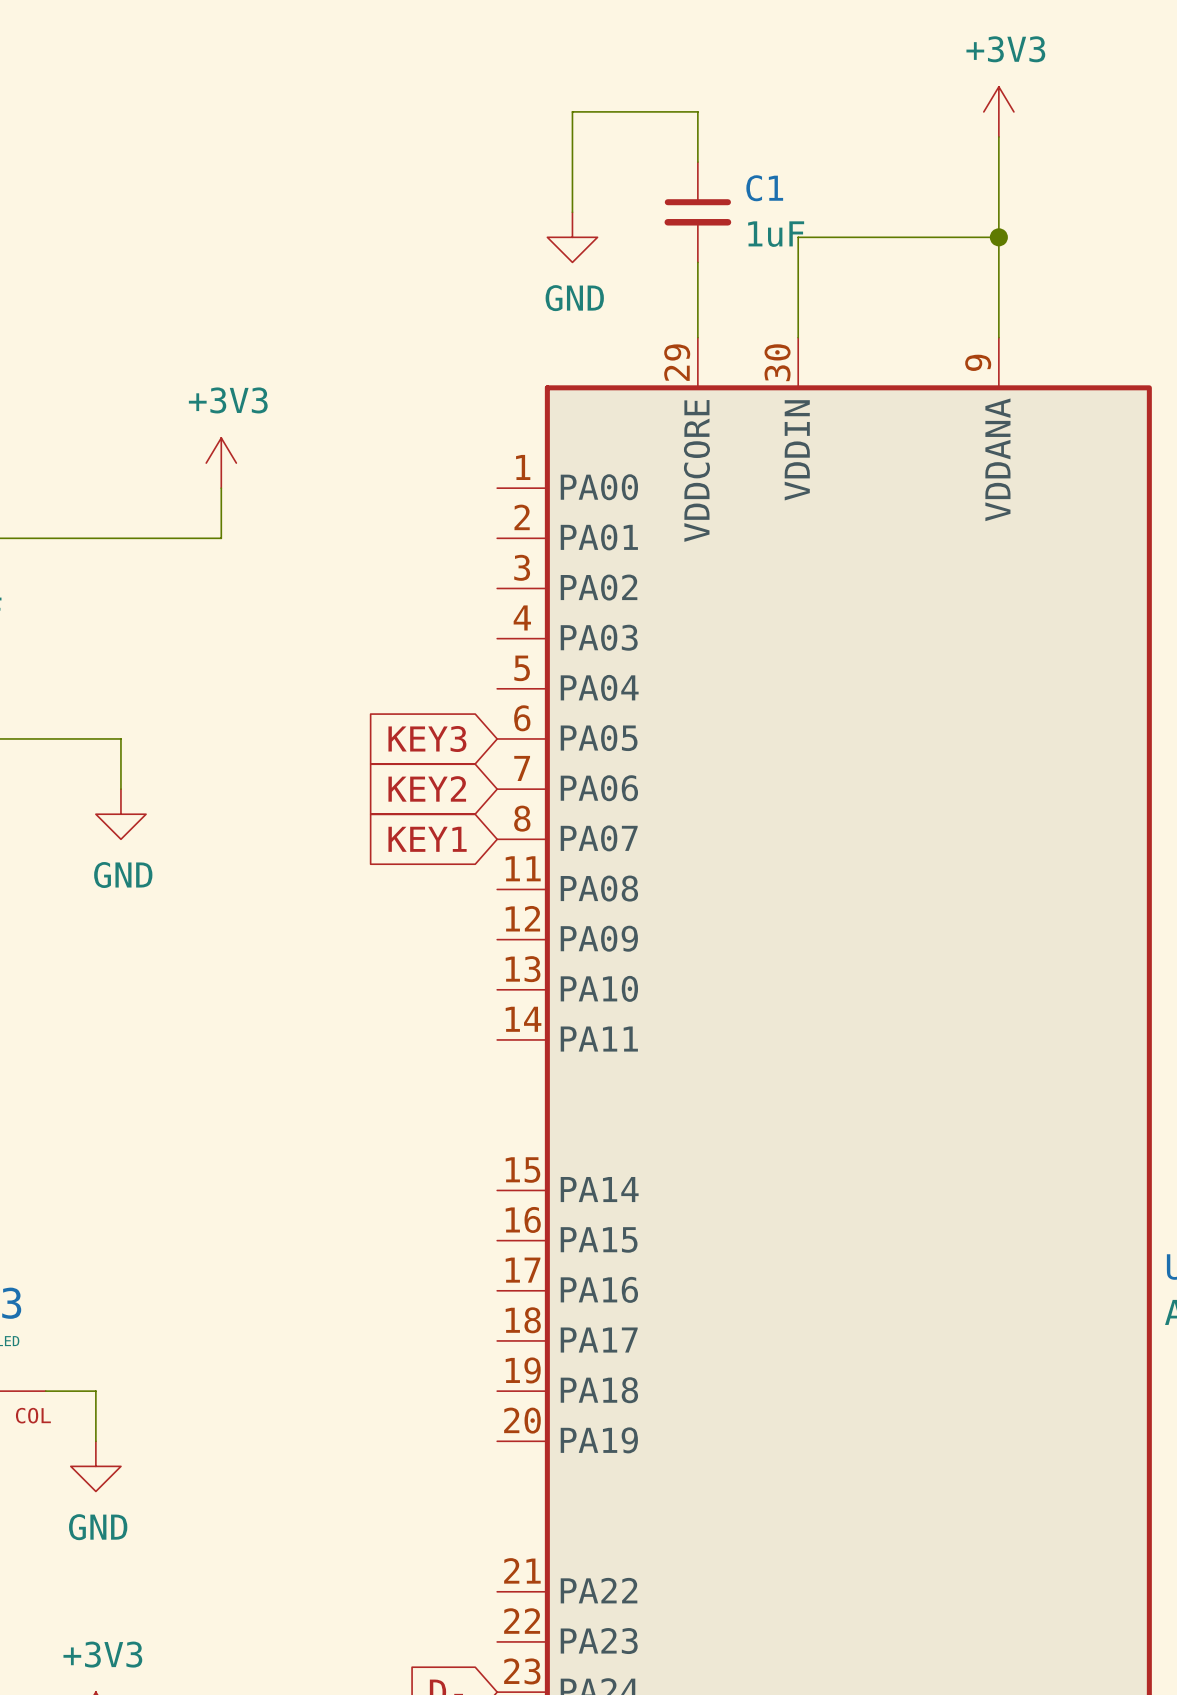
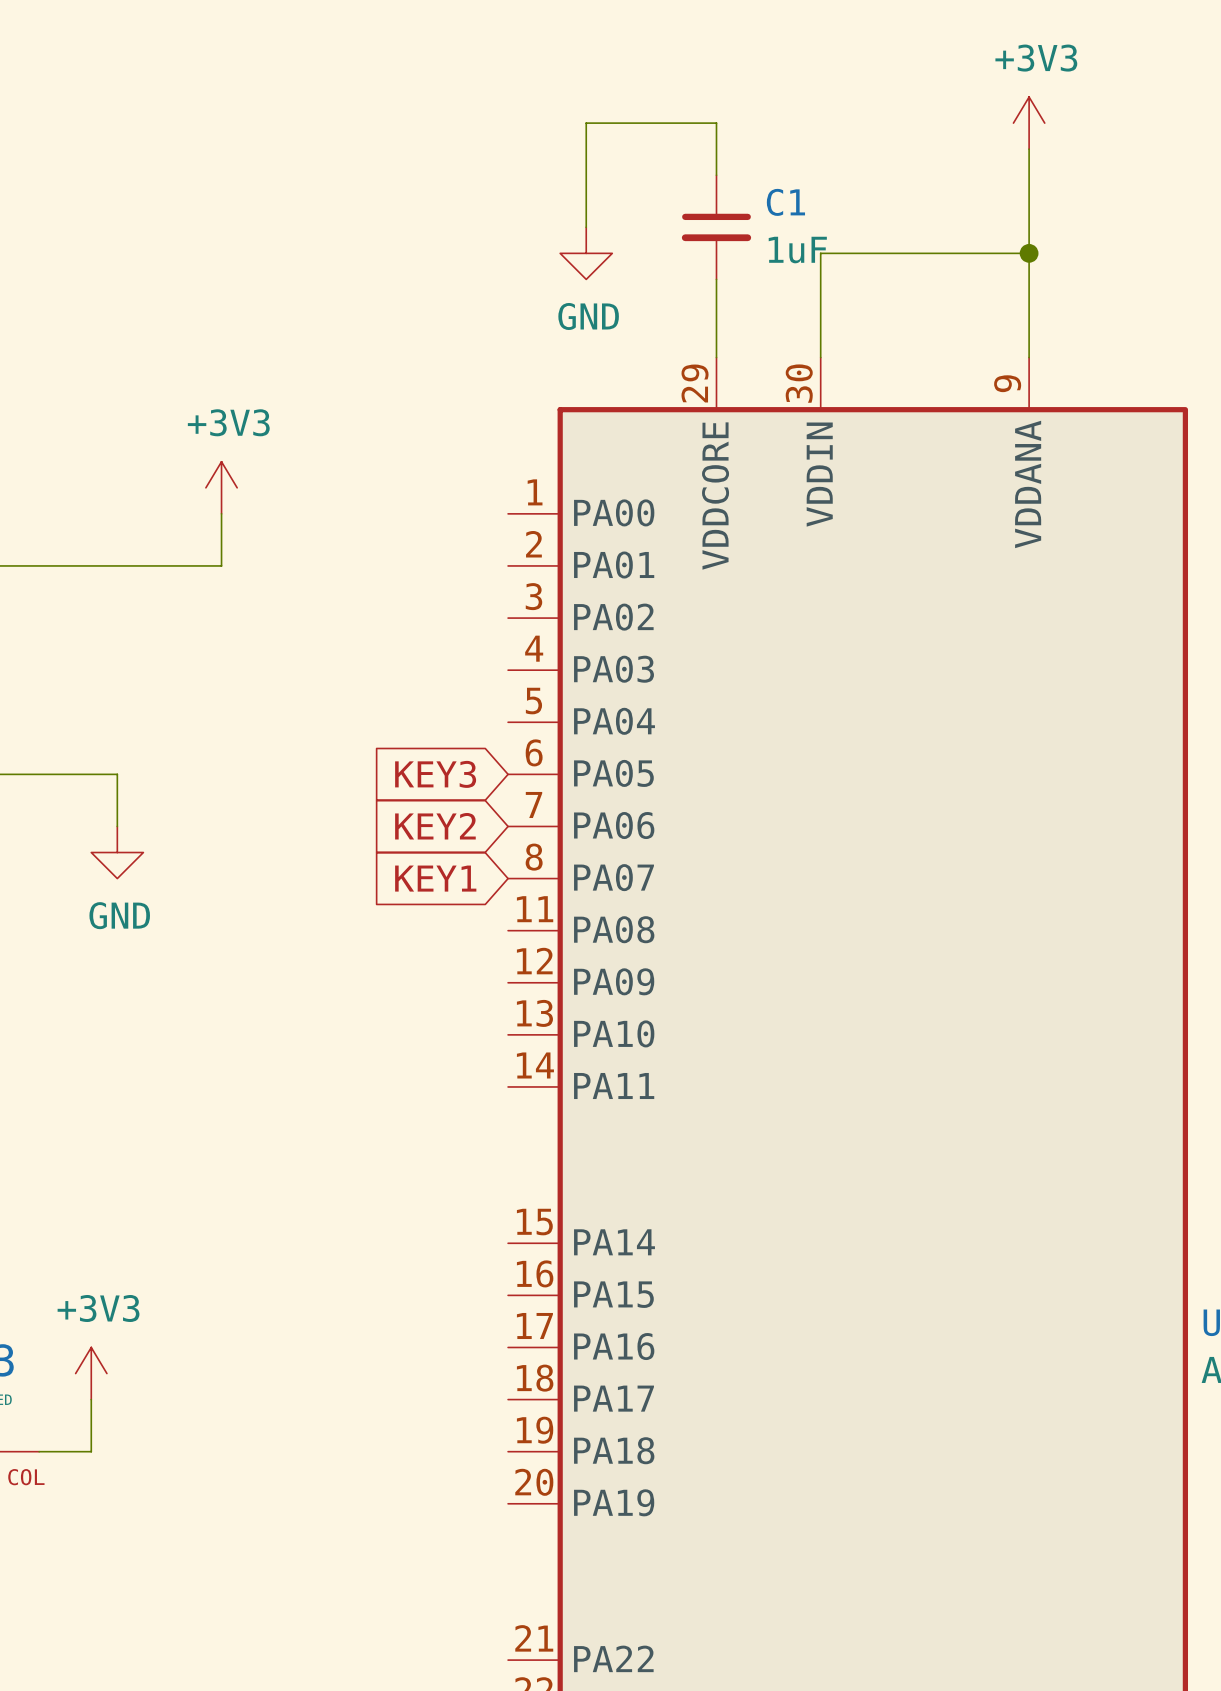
power symbol: none -> +3V3 (91, 1373)
wire: (95, 1391) (95, 1441) -> (91, 1451) (91, 1399)
power symbol: GND (95, 1466) -> none

